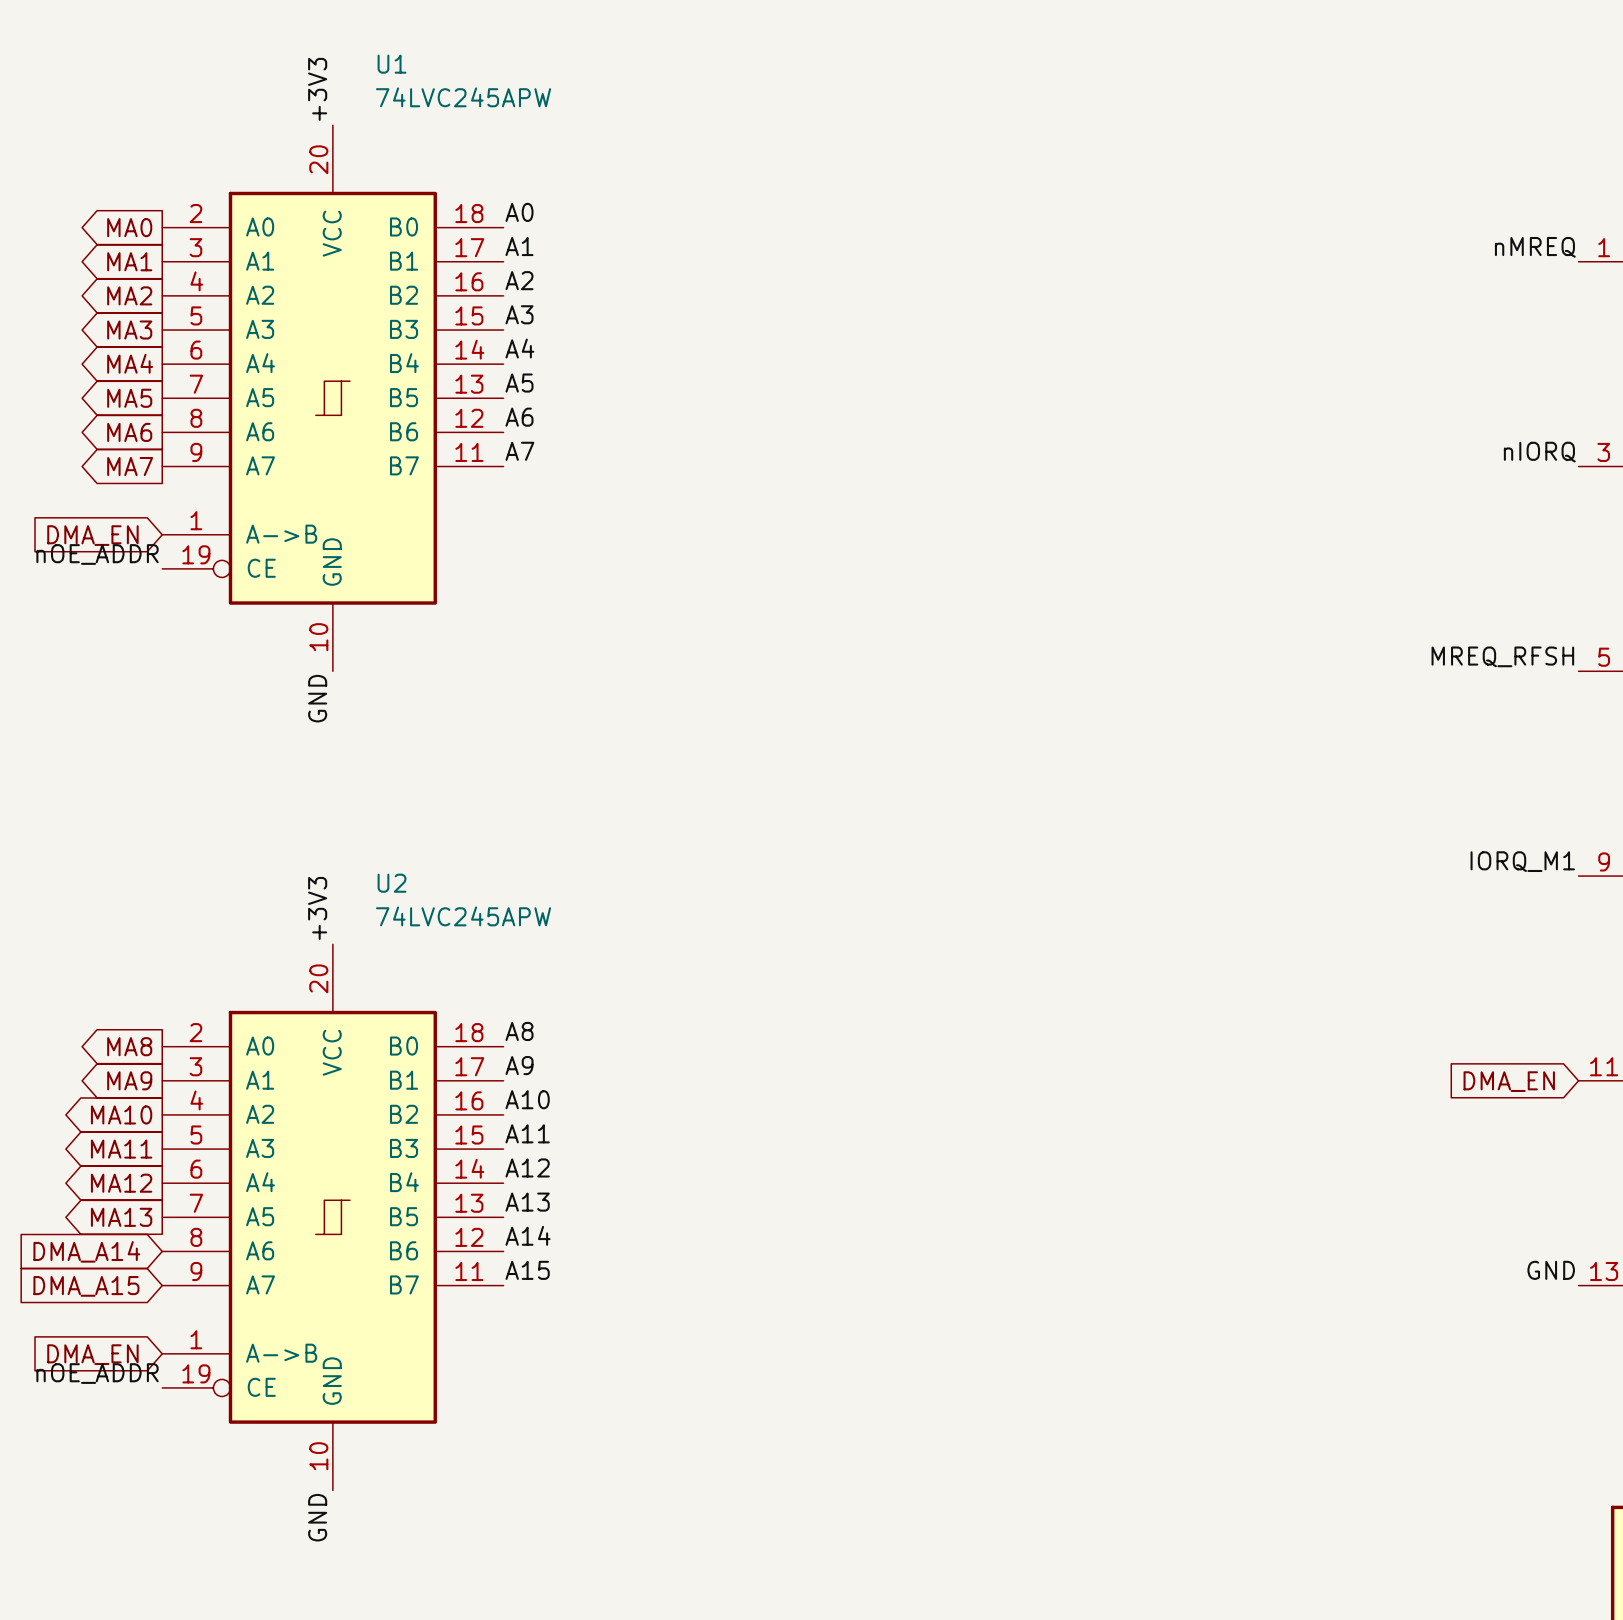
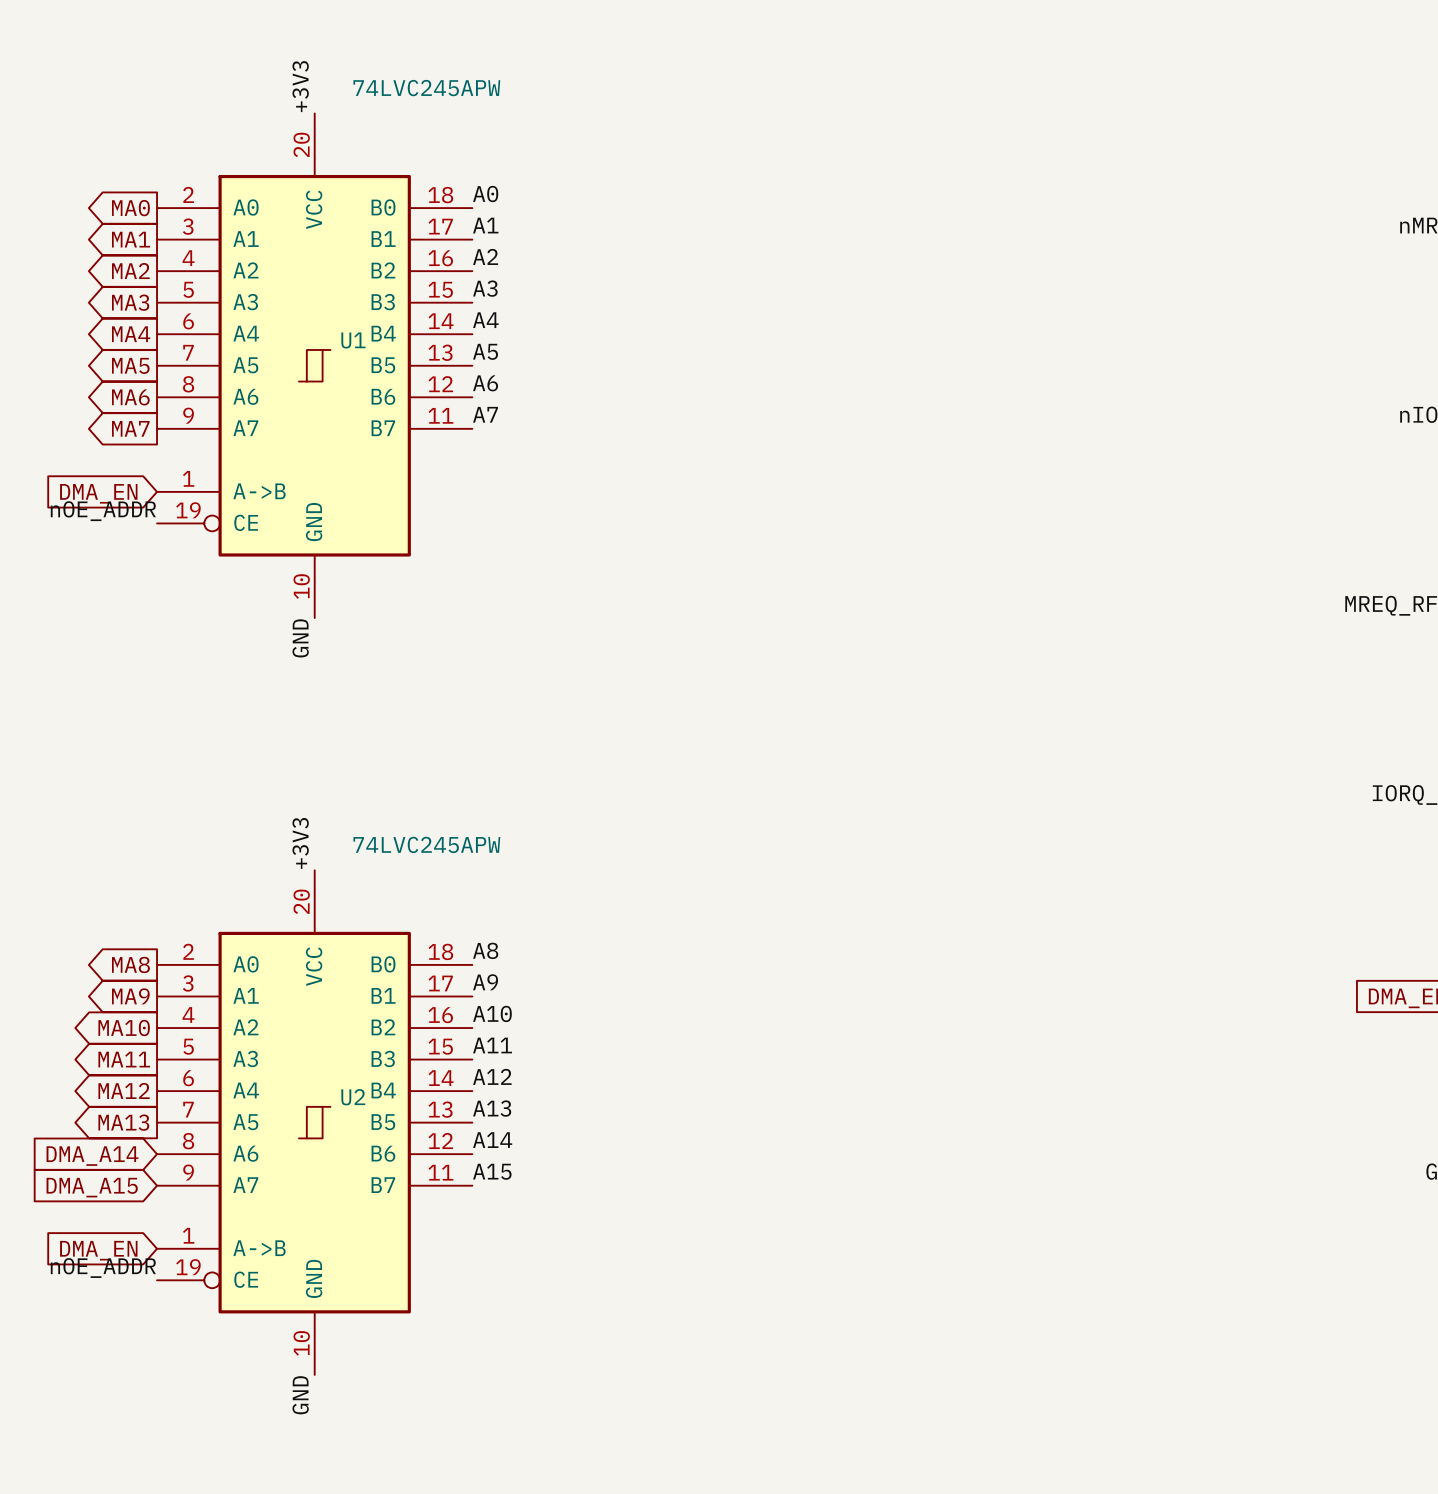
U1 name position: U1 (392, 64) -> U1 (353, 340)
U2 name position: U2 (392, 883) -> U2 (353, 1097)

